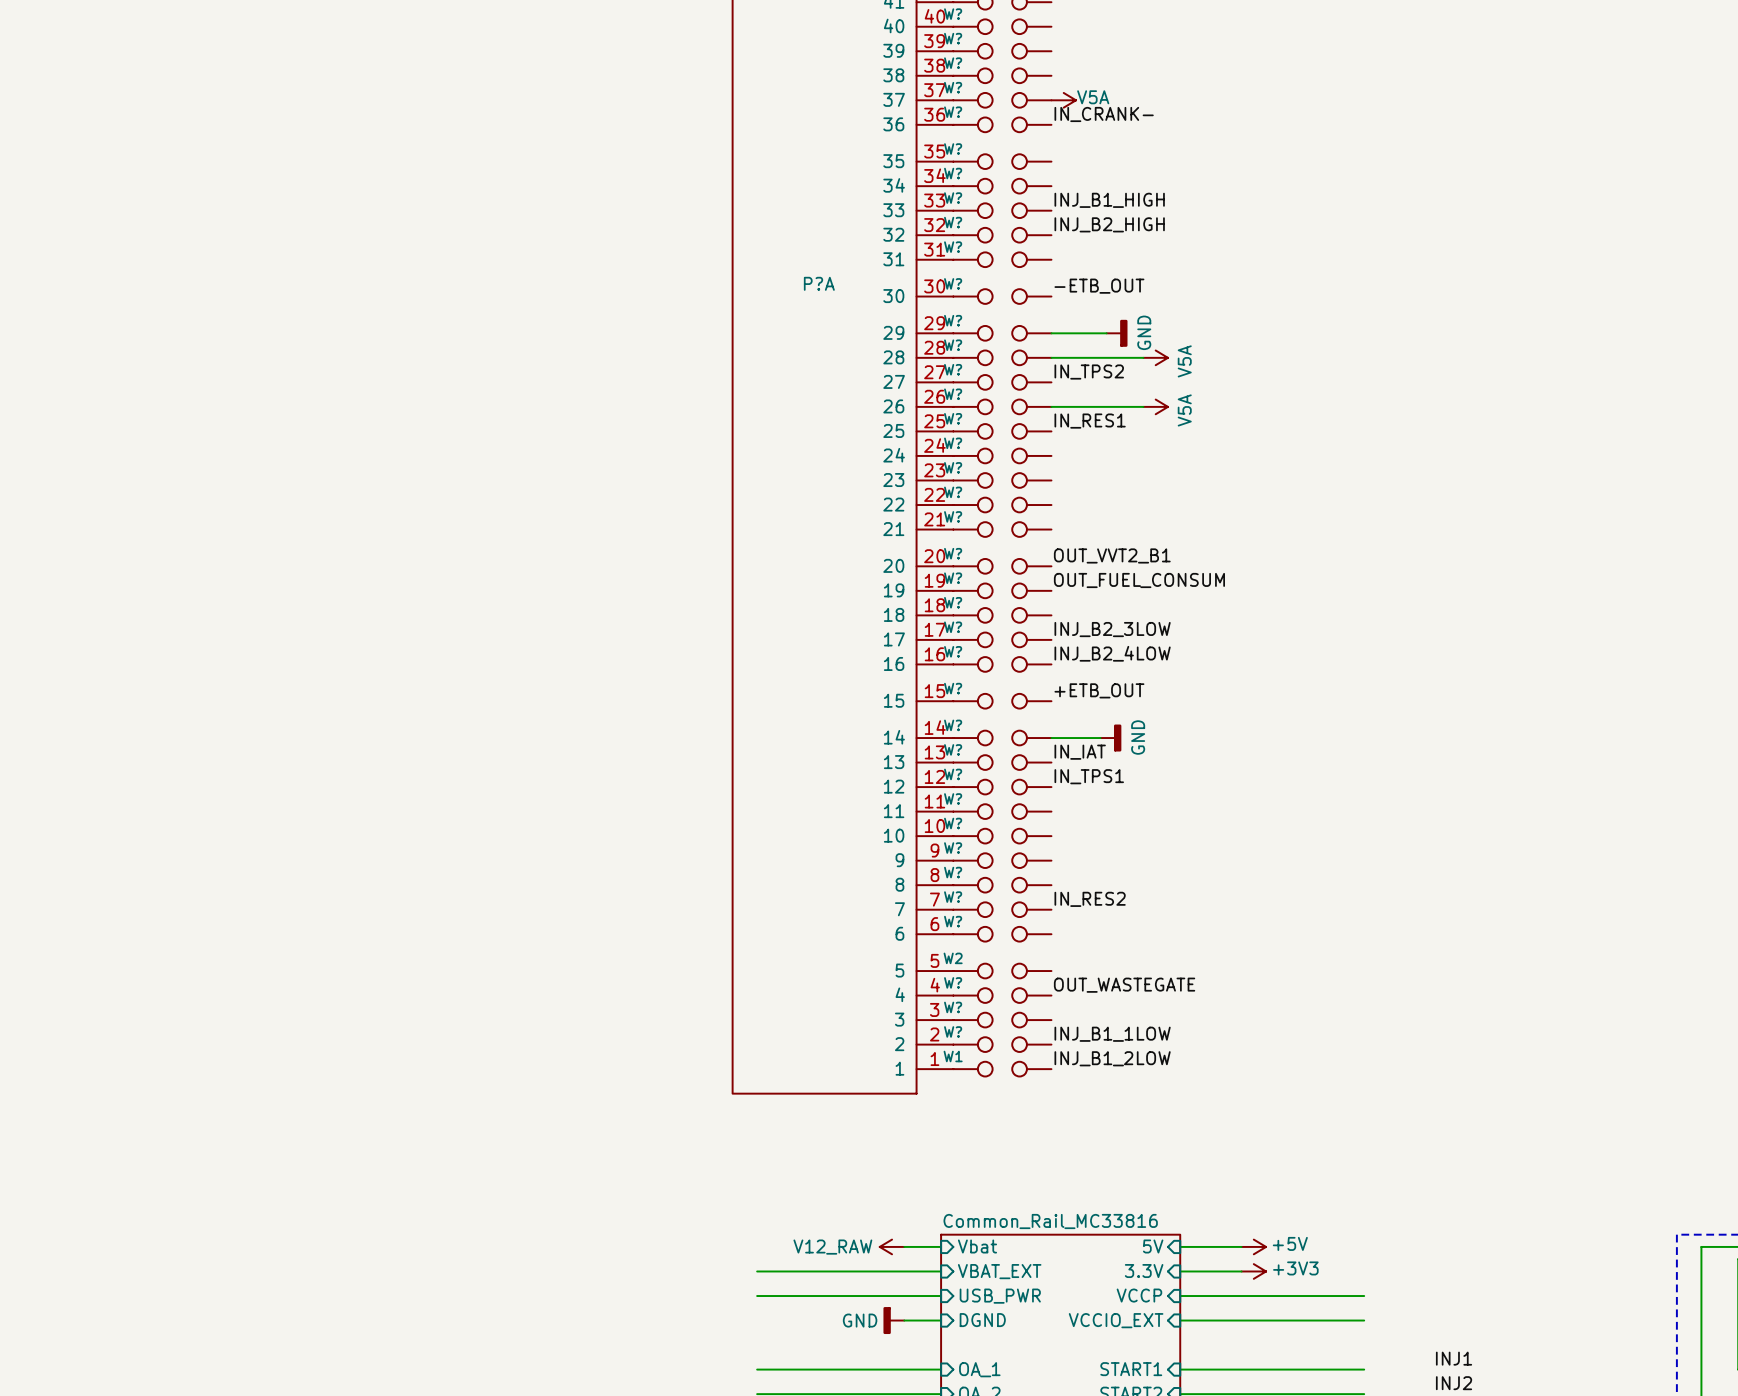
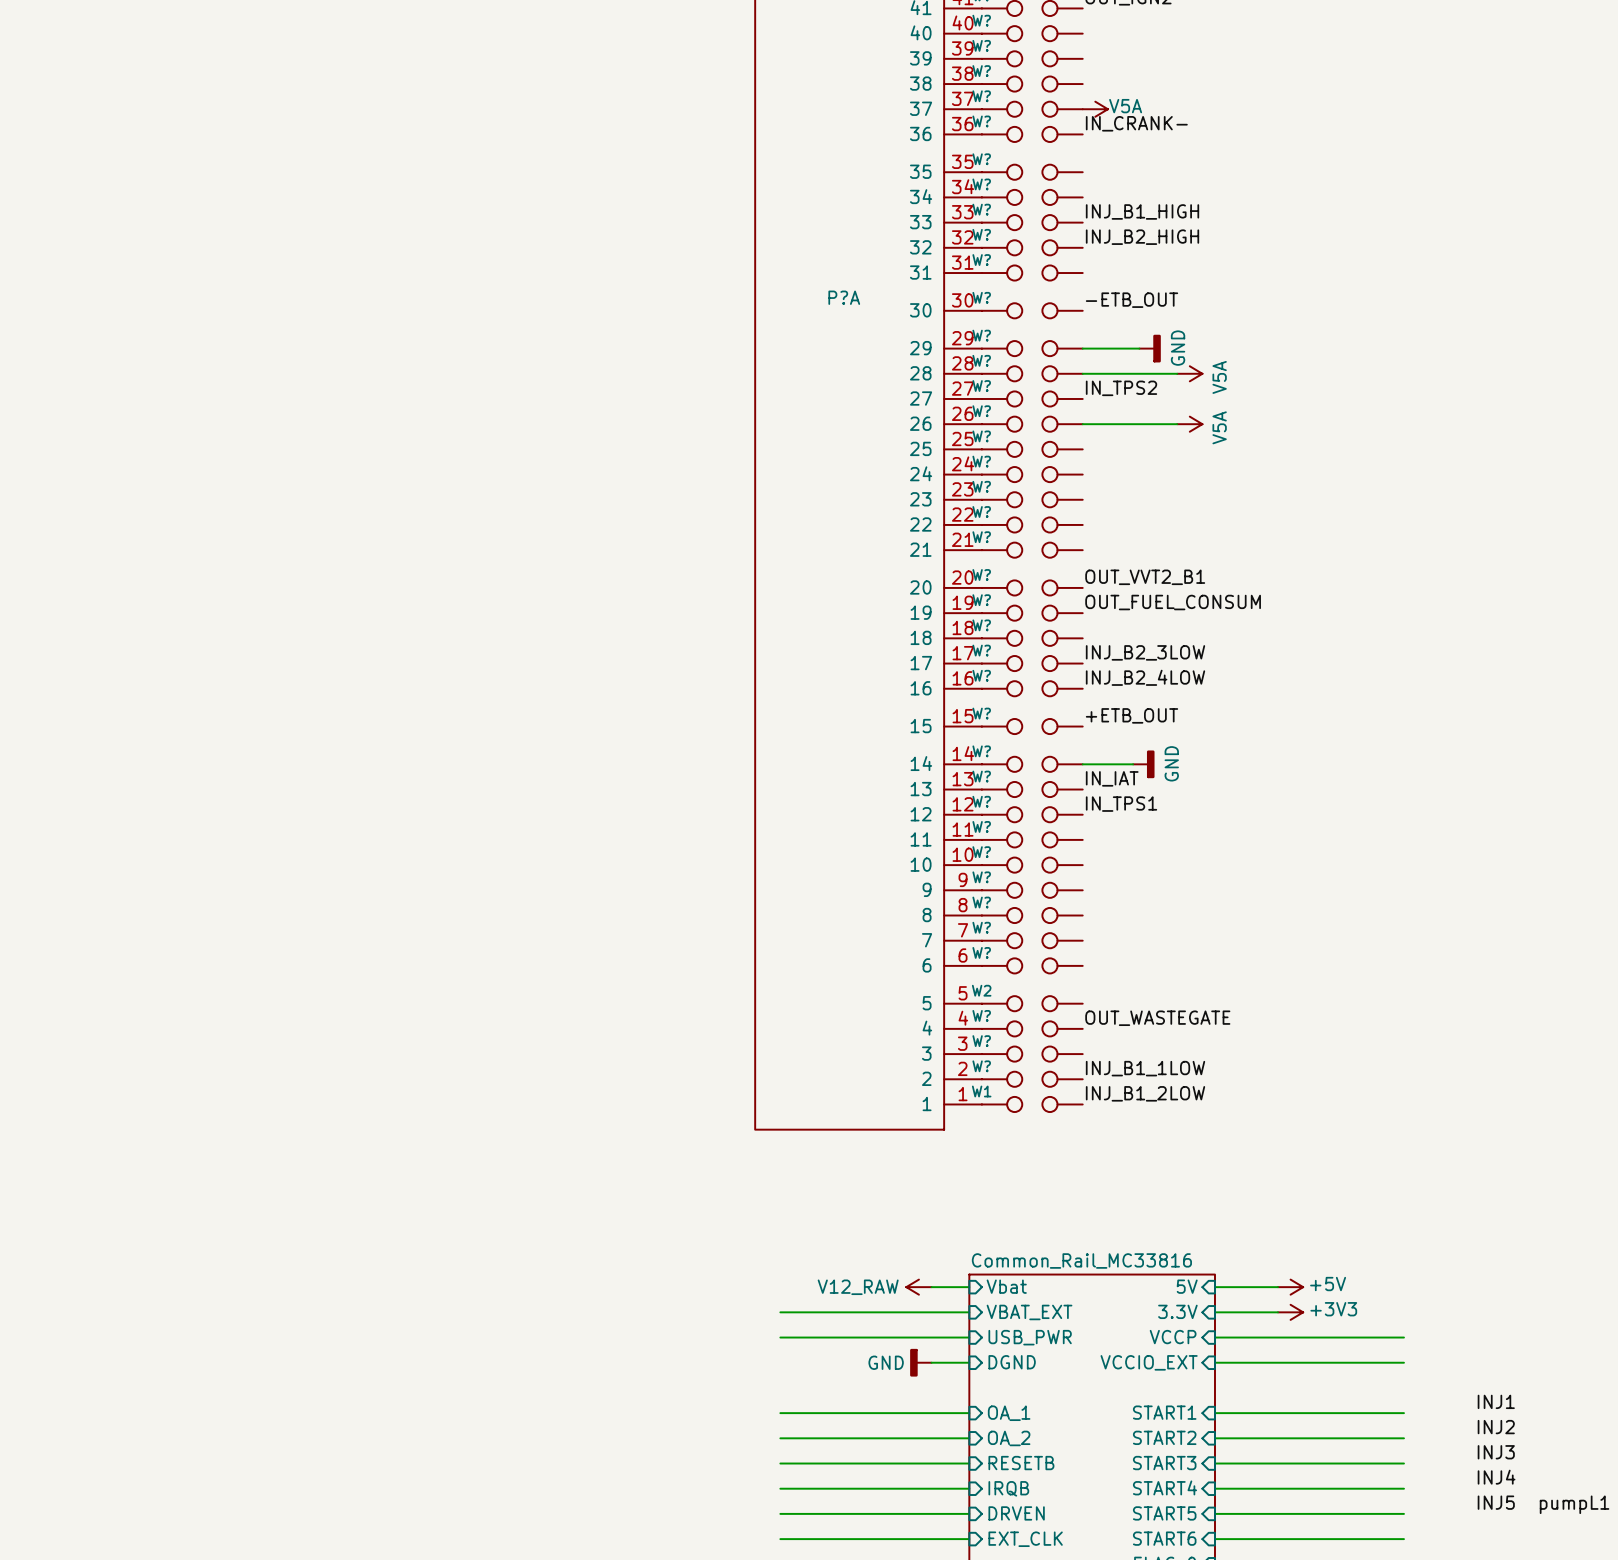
label: IN_RES1 (1090, 421) -> none
label: IN_RES2 (1090, 899) -> none

